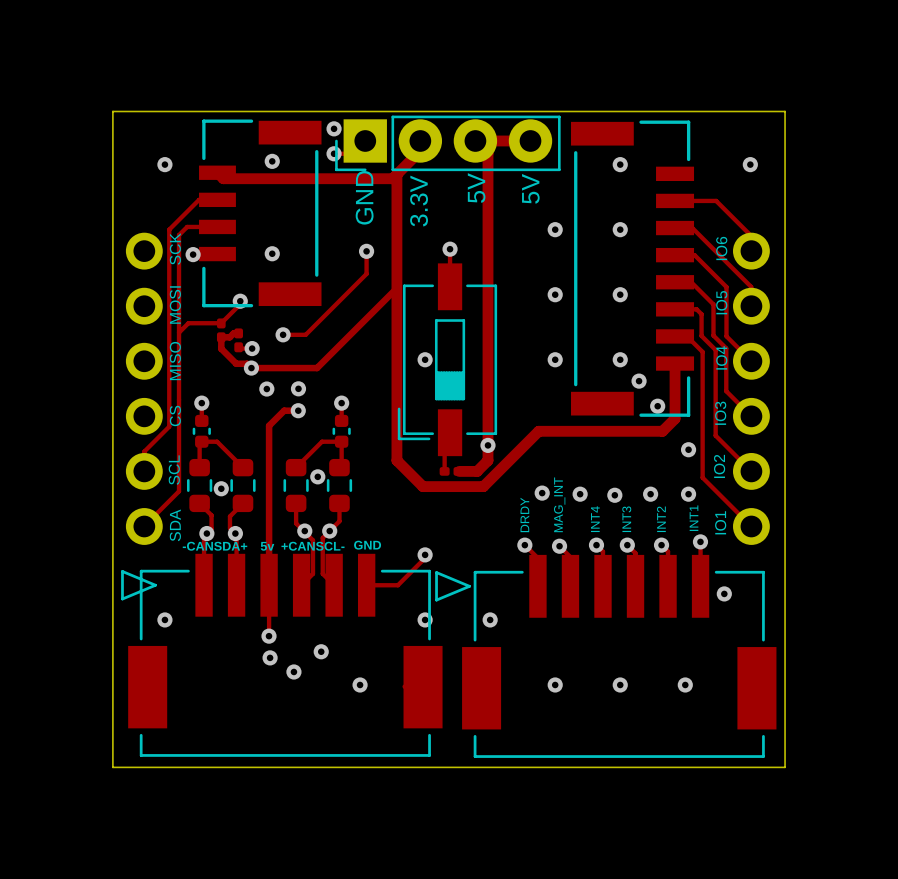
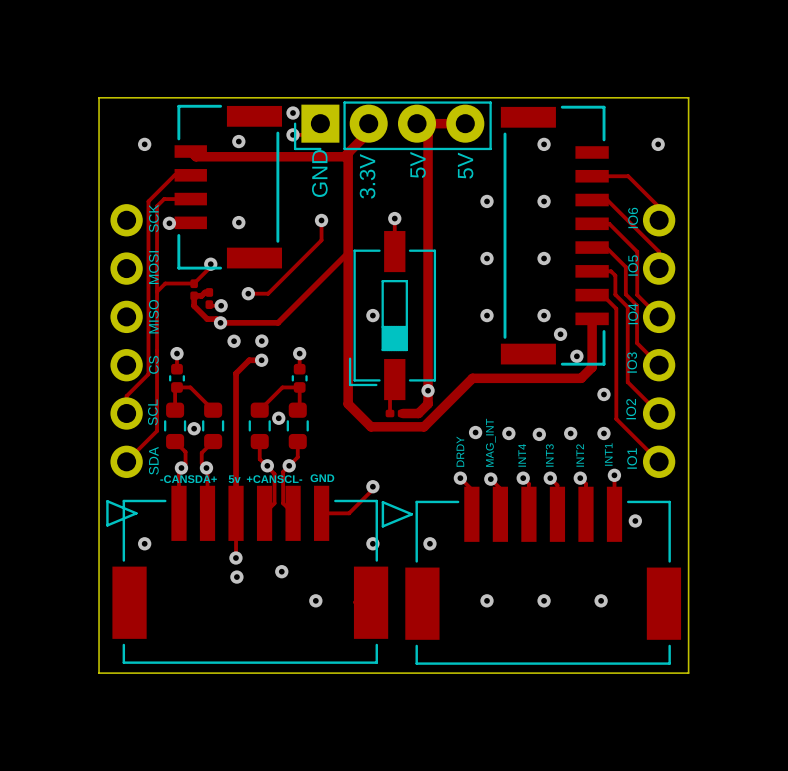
via: (293, 671) -> none

